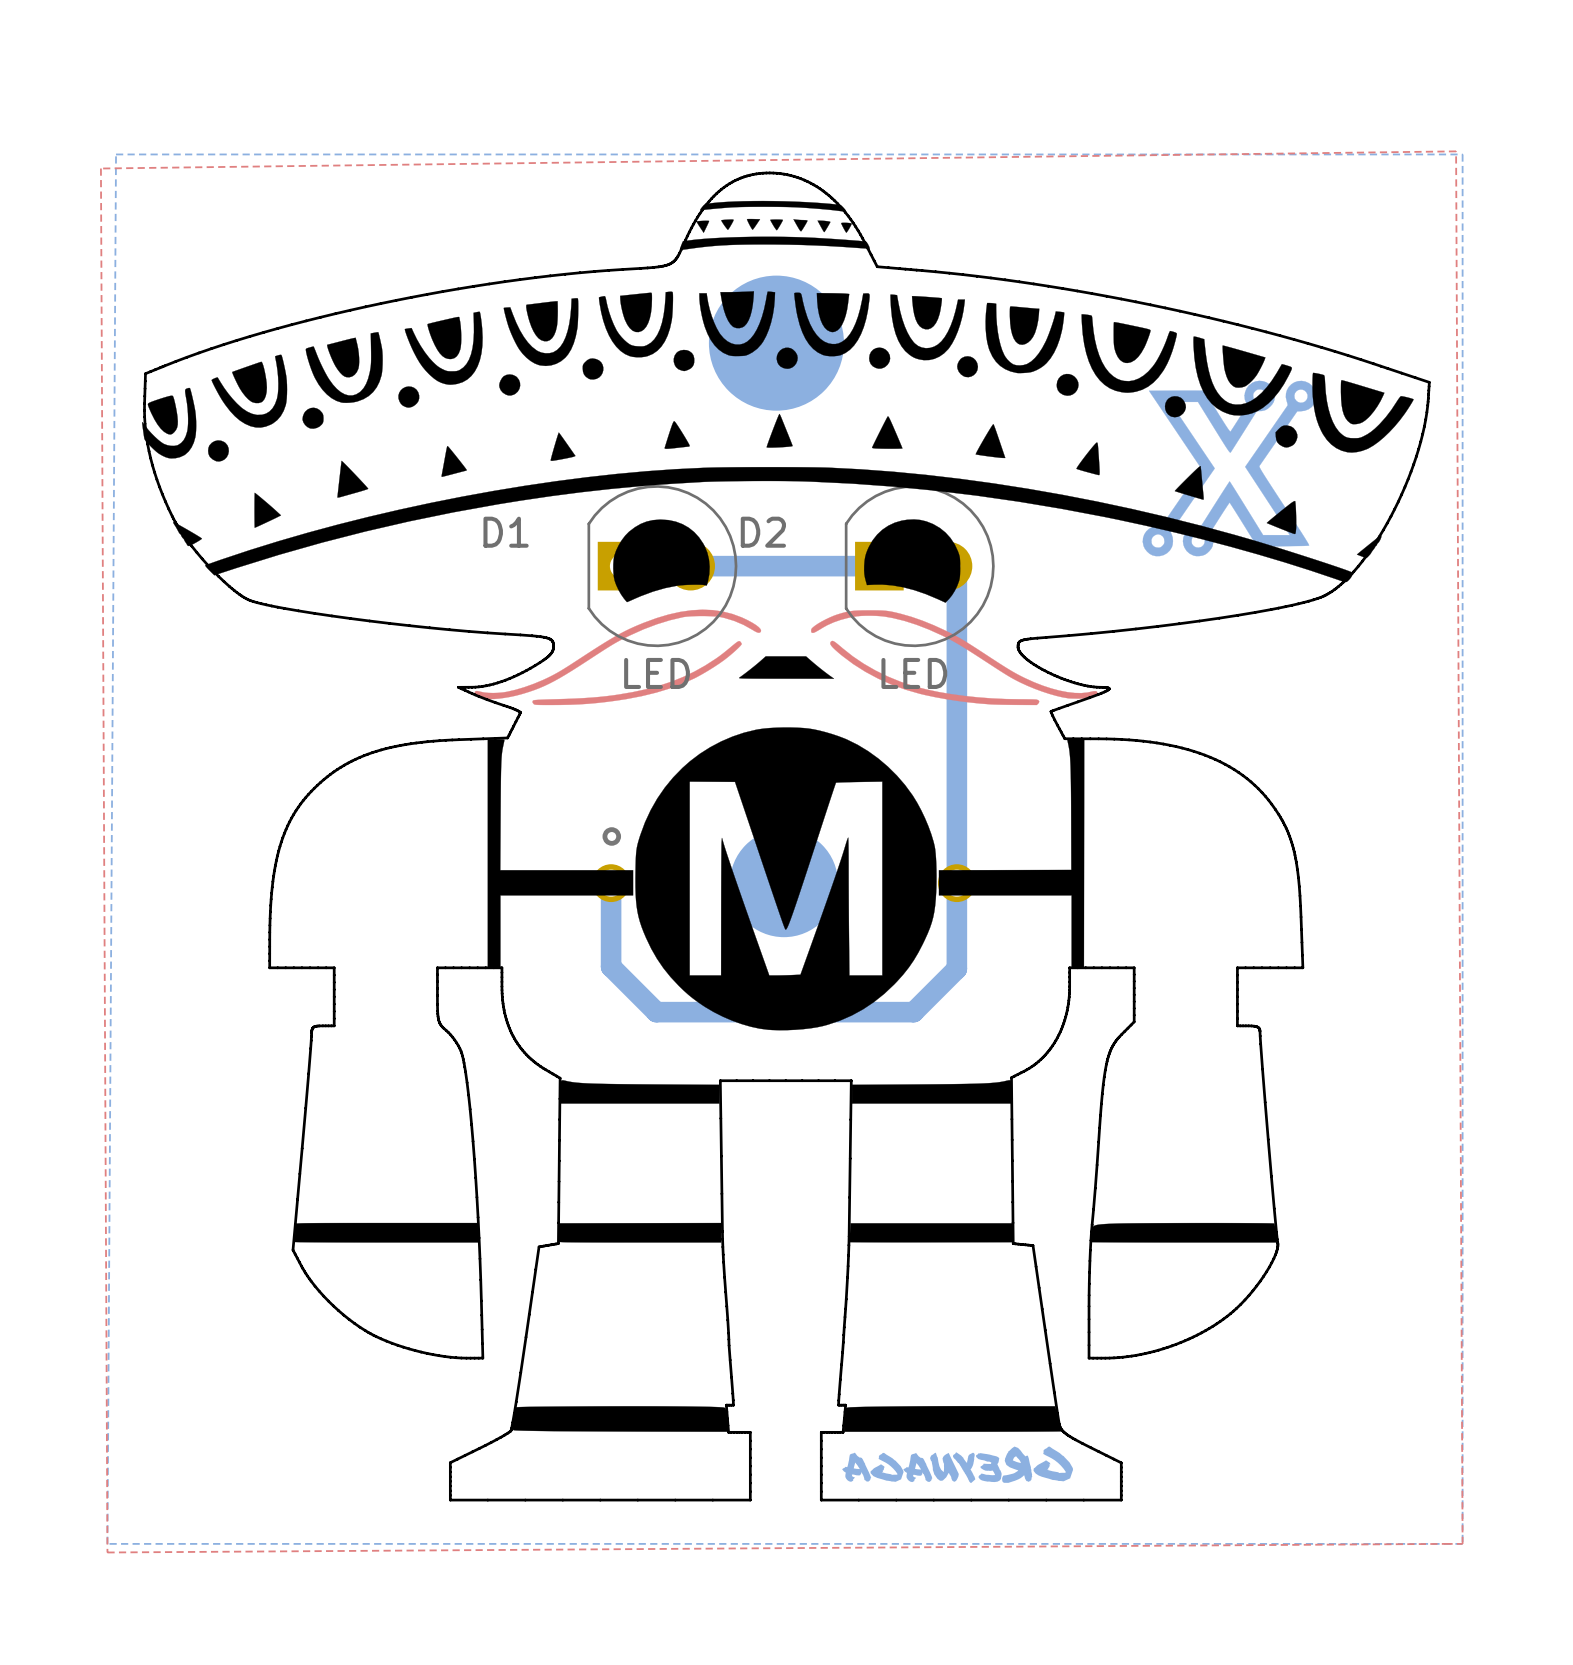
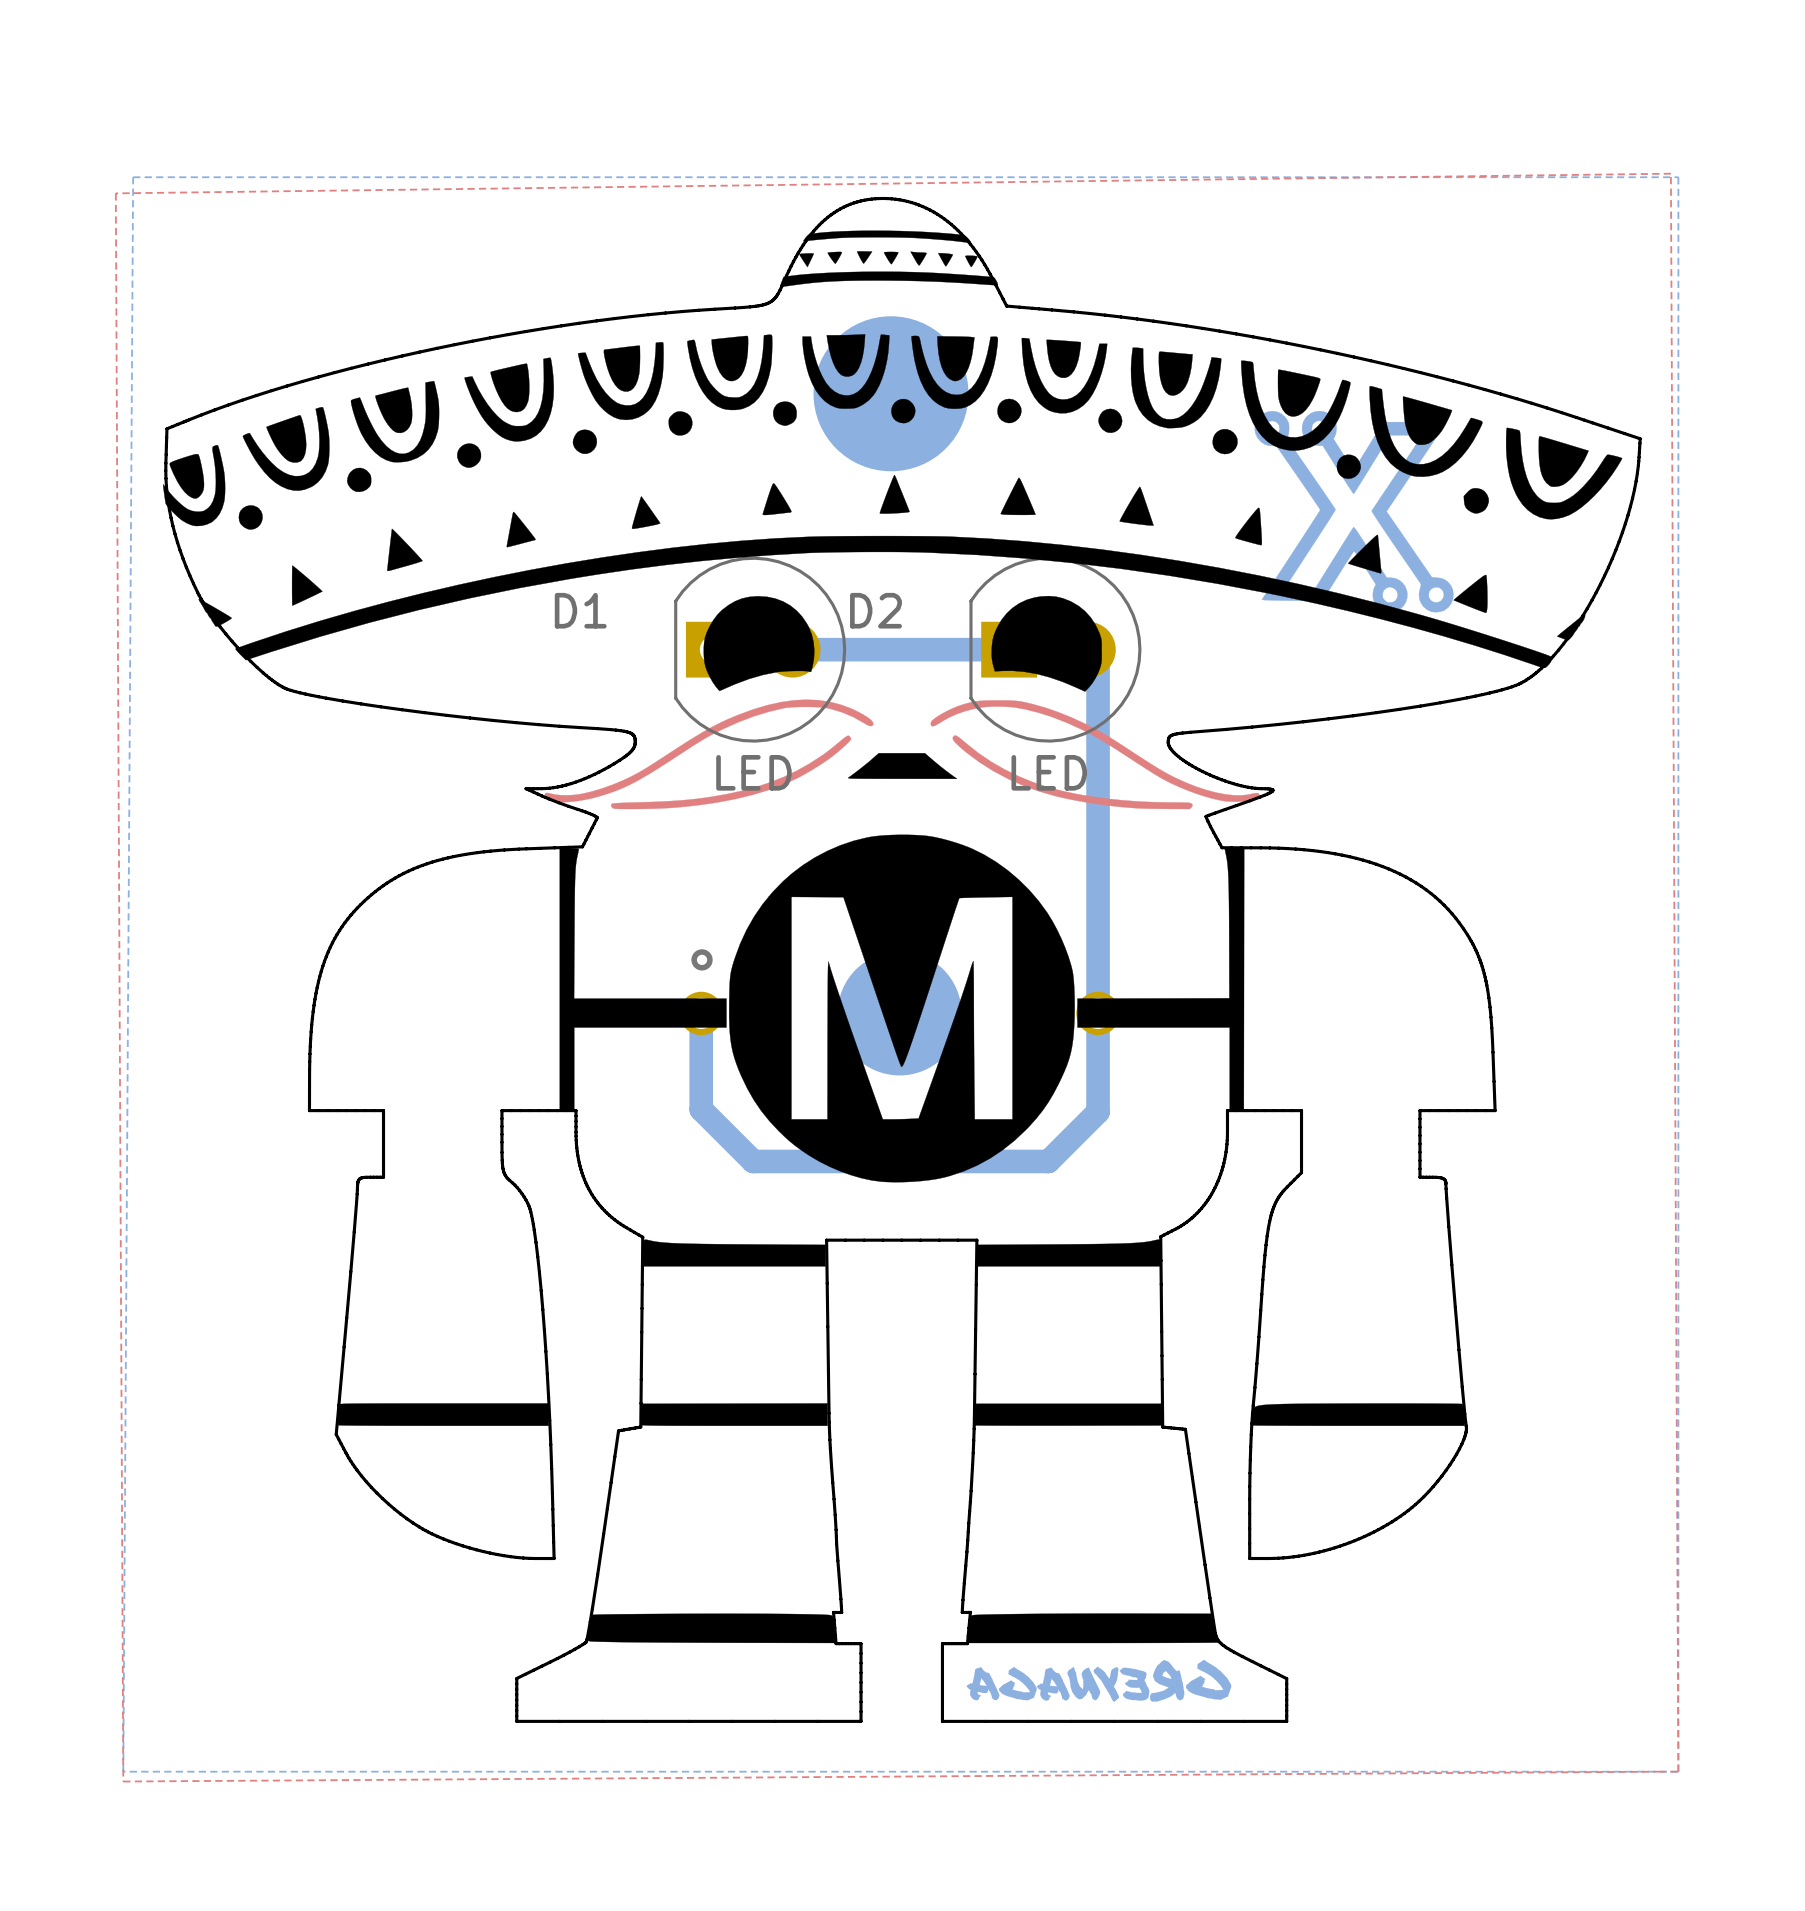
drawing: none -> [1254, 410, 1454, 613]
drawing: [1142, 380, 1317, 557] -> none

